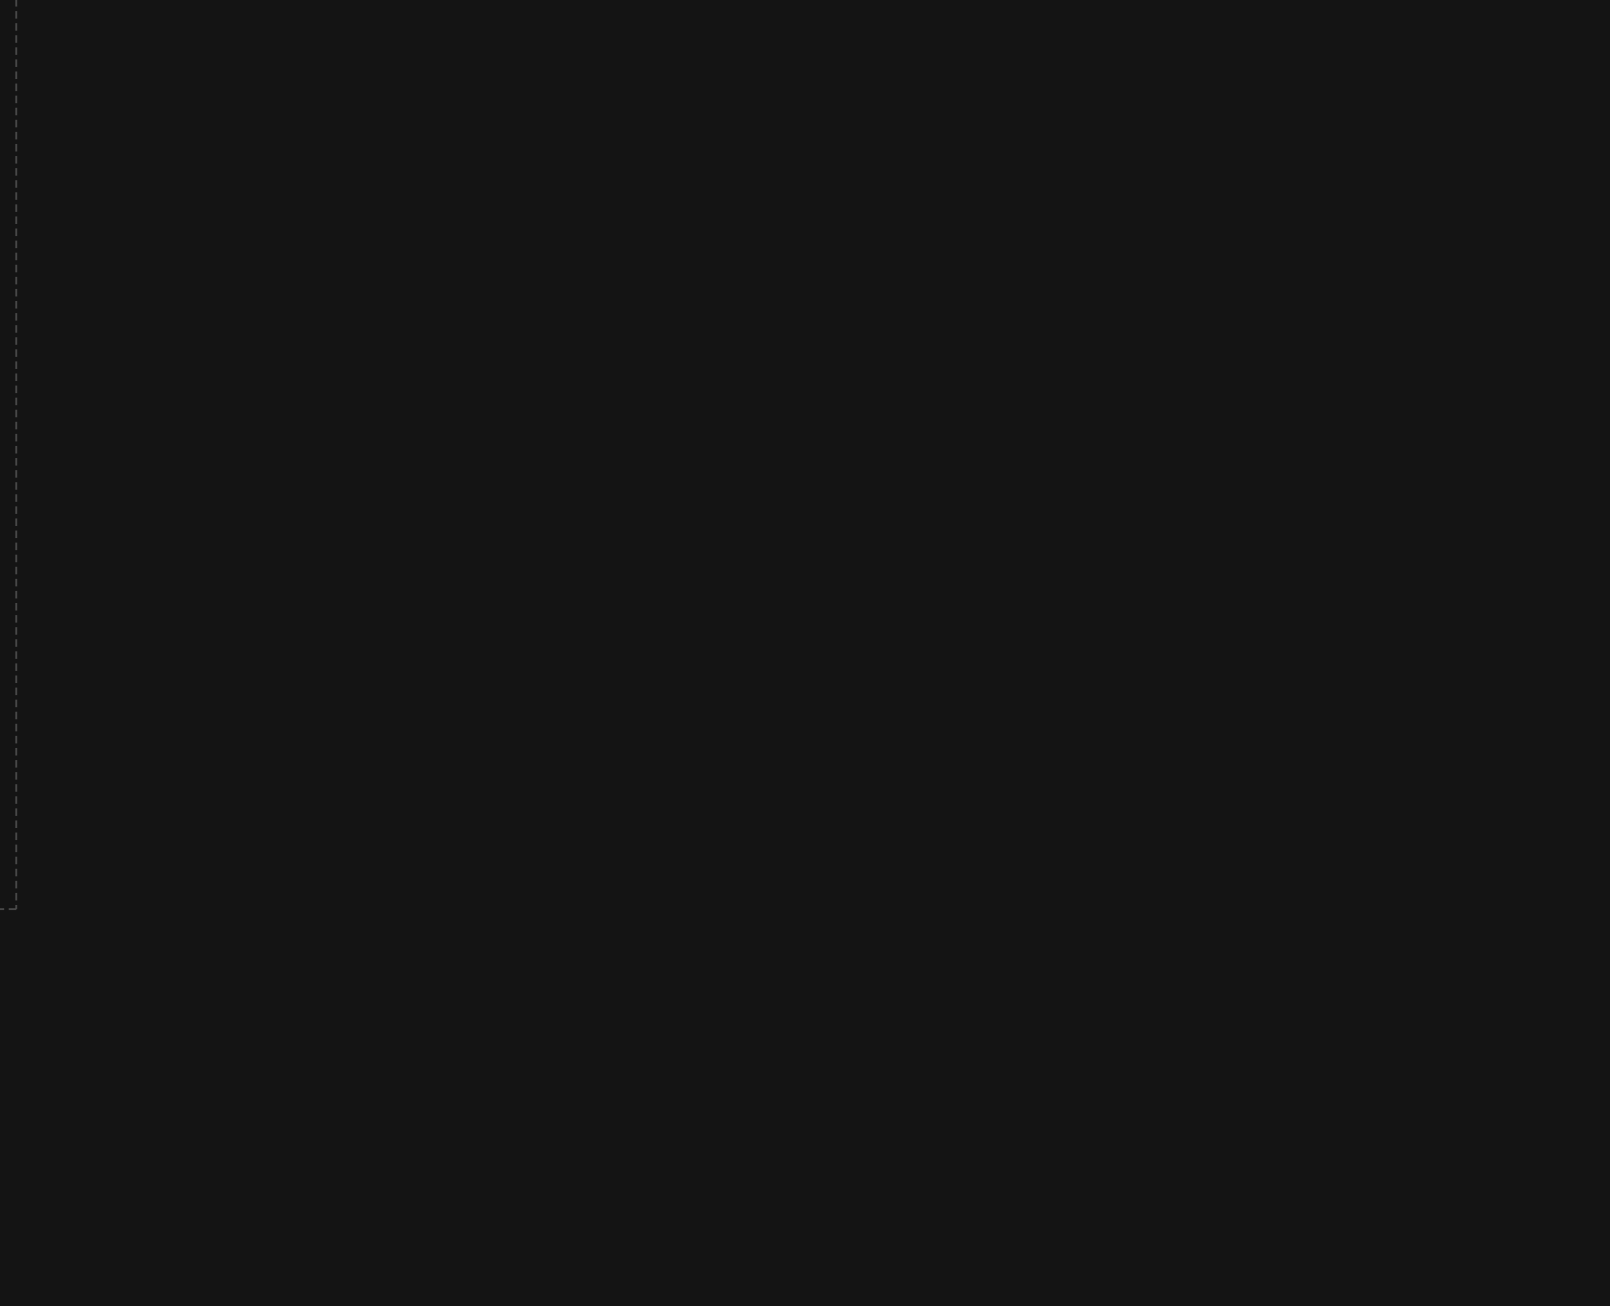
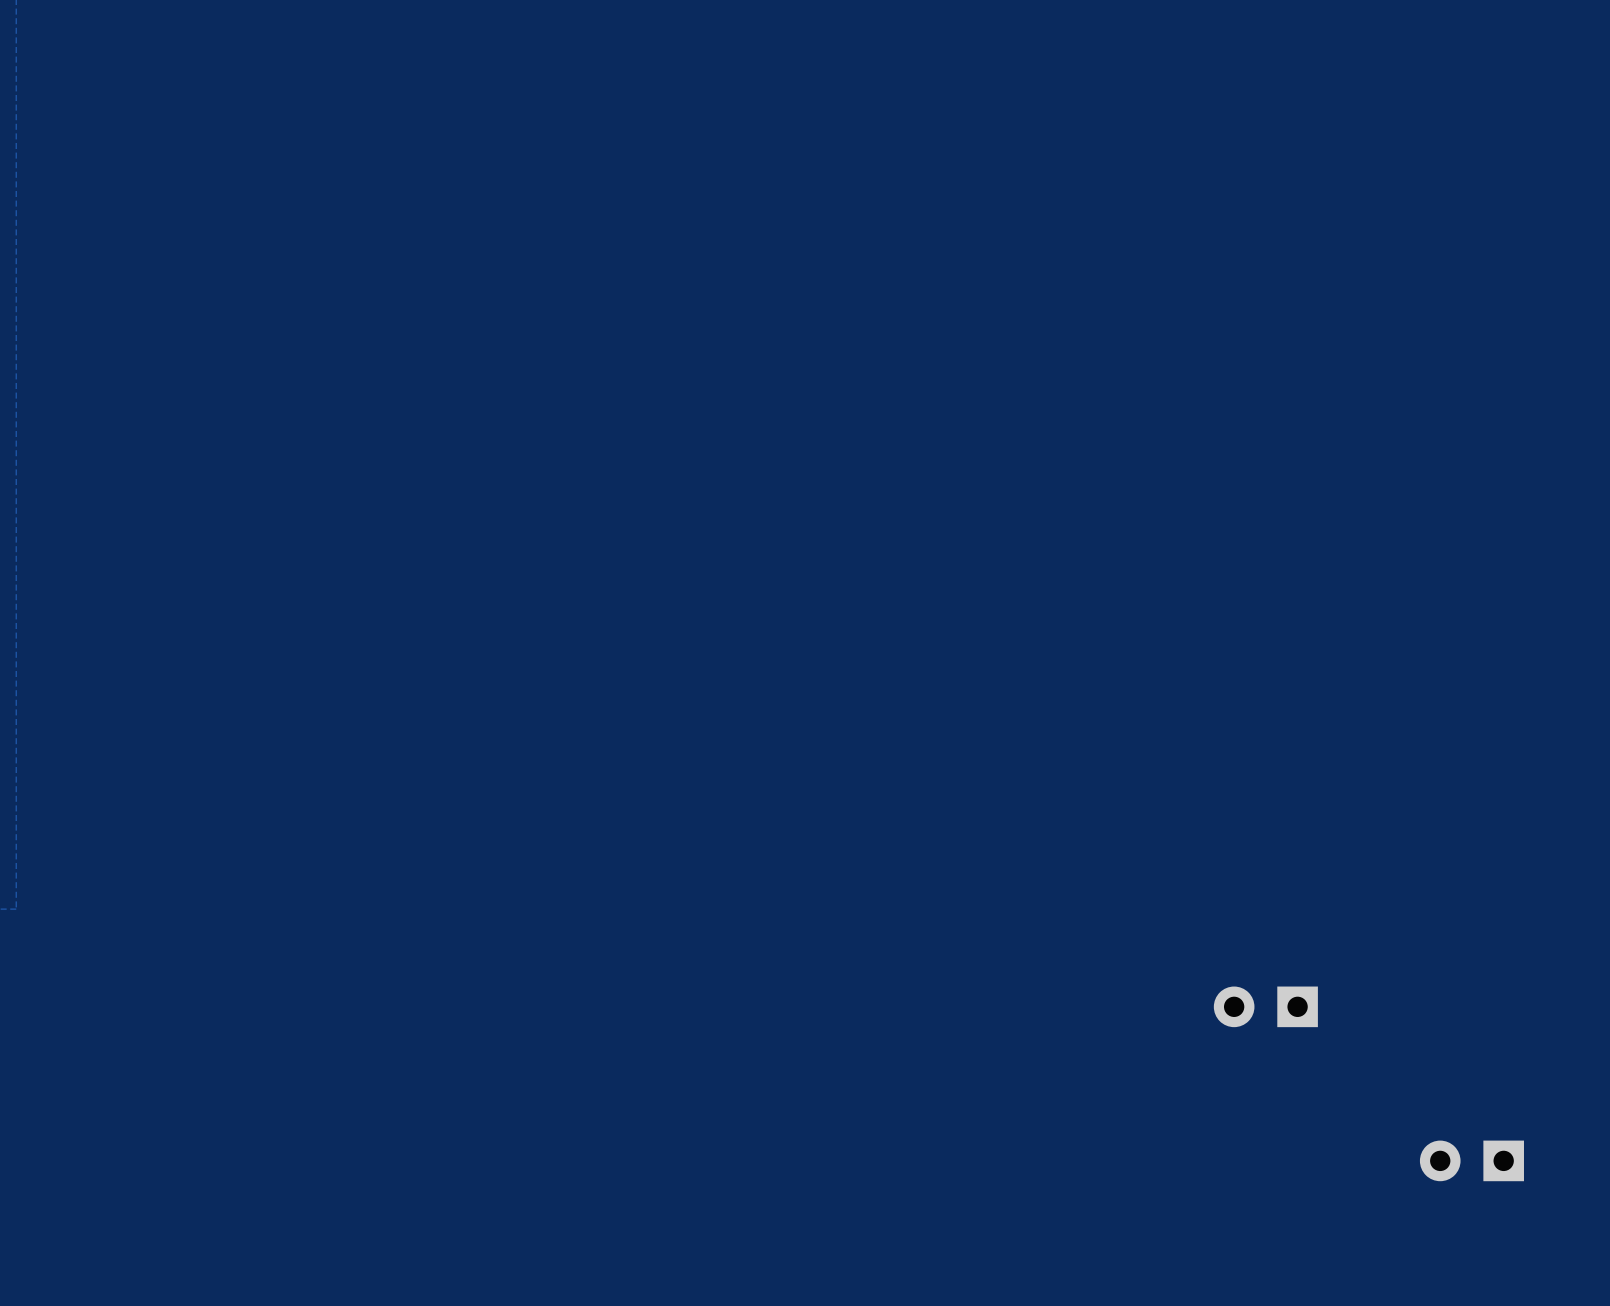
part: none -> (1265, 1006)
part: none -> (1471, 1160)

